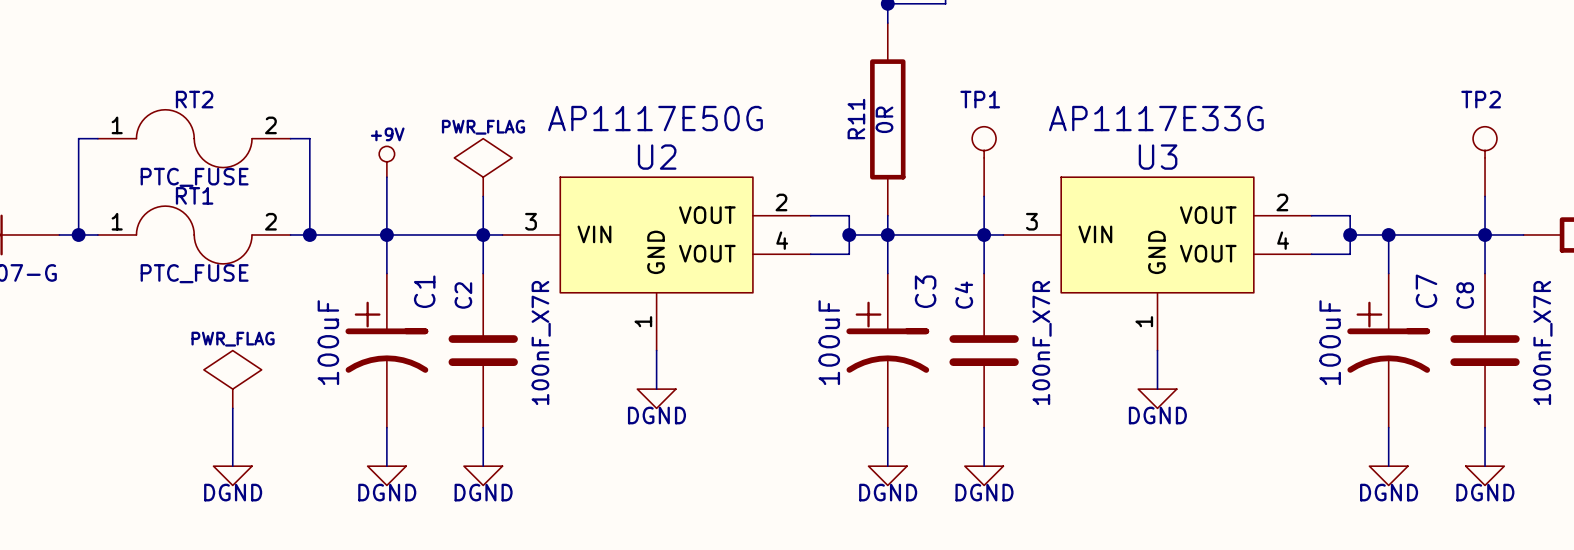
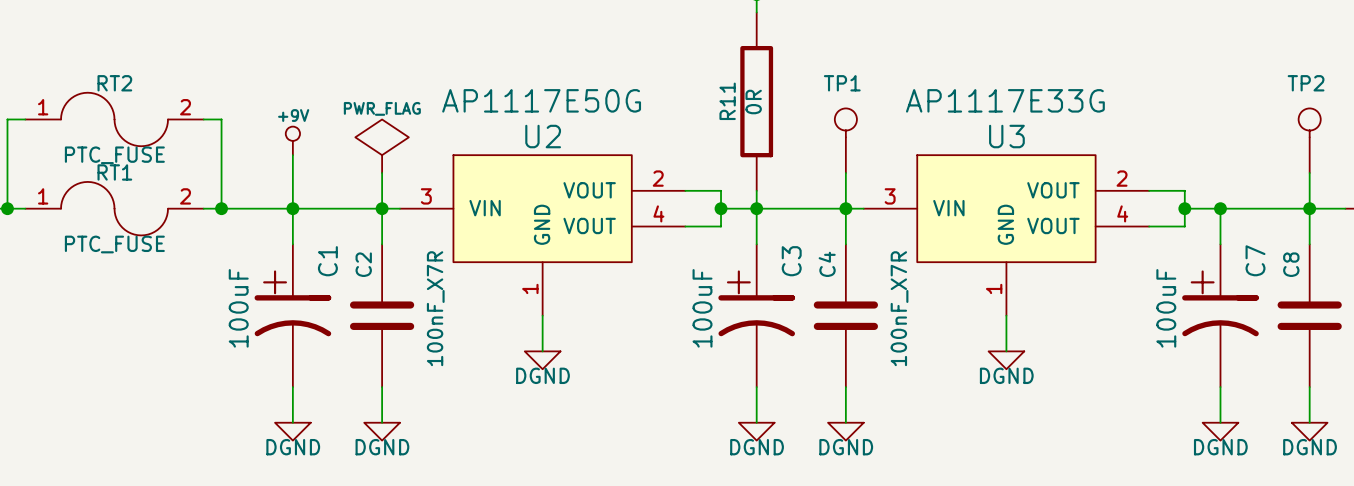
power symbol: PWR_FLAG (232, 379) -> none
wire: (232, 408) (232, 466) -> none
power symbol: DGND (232, 475) -> none

